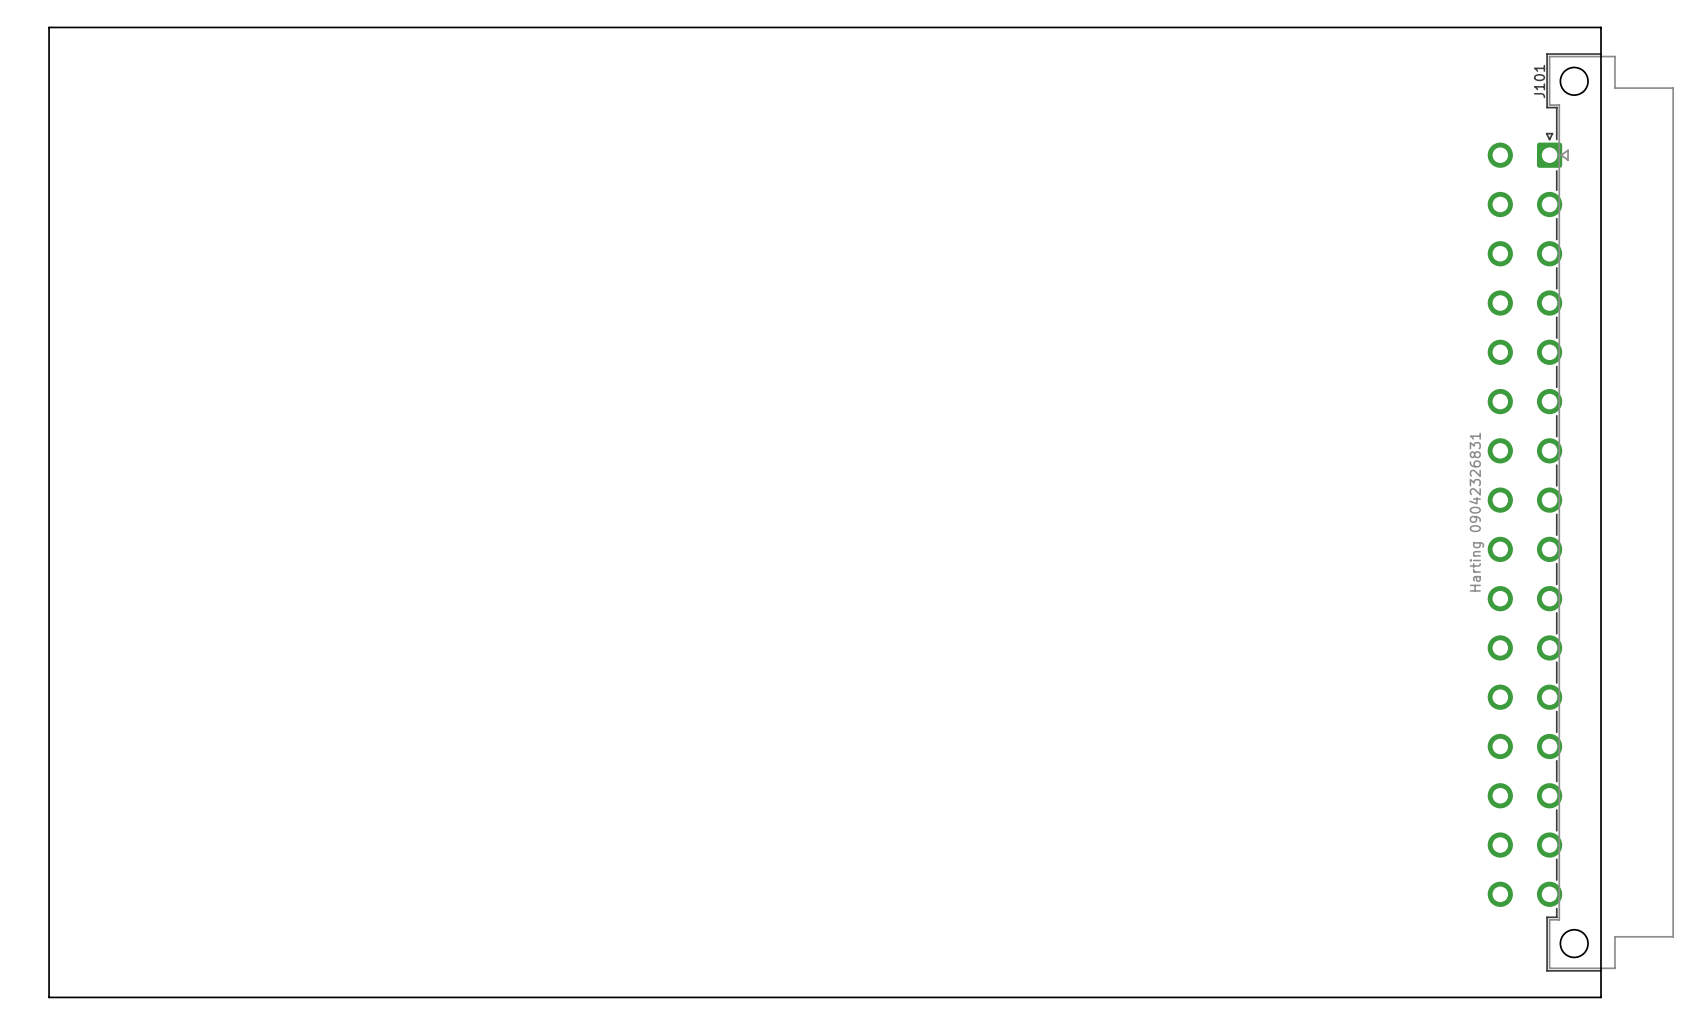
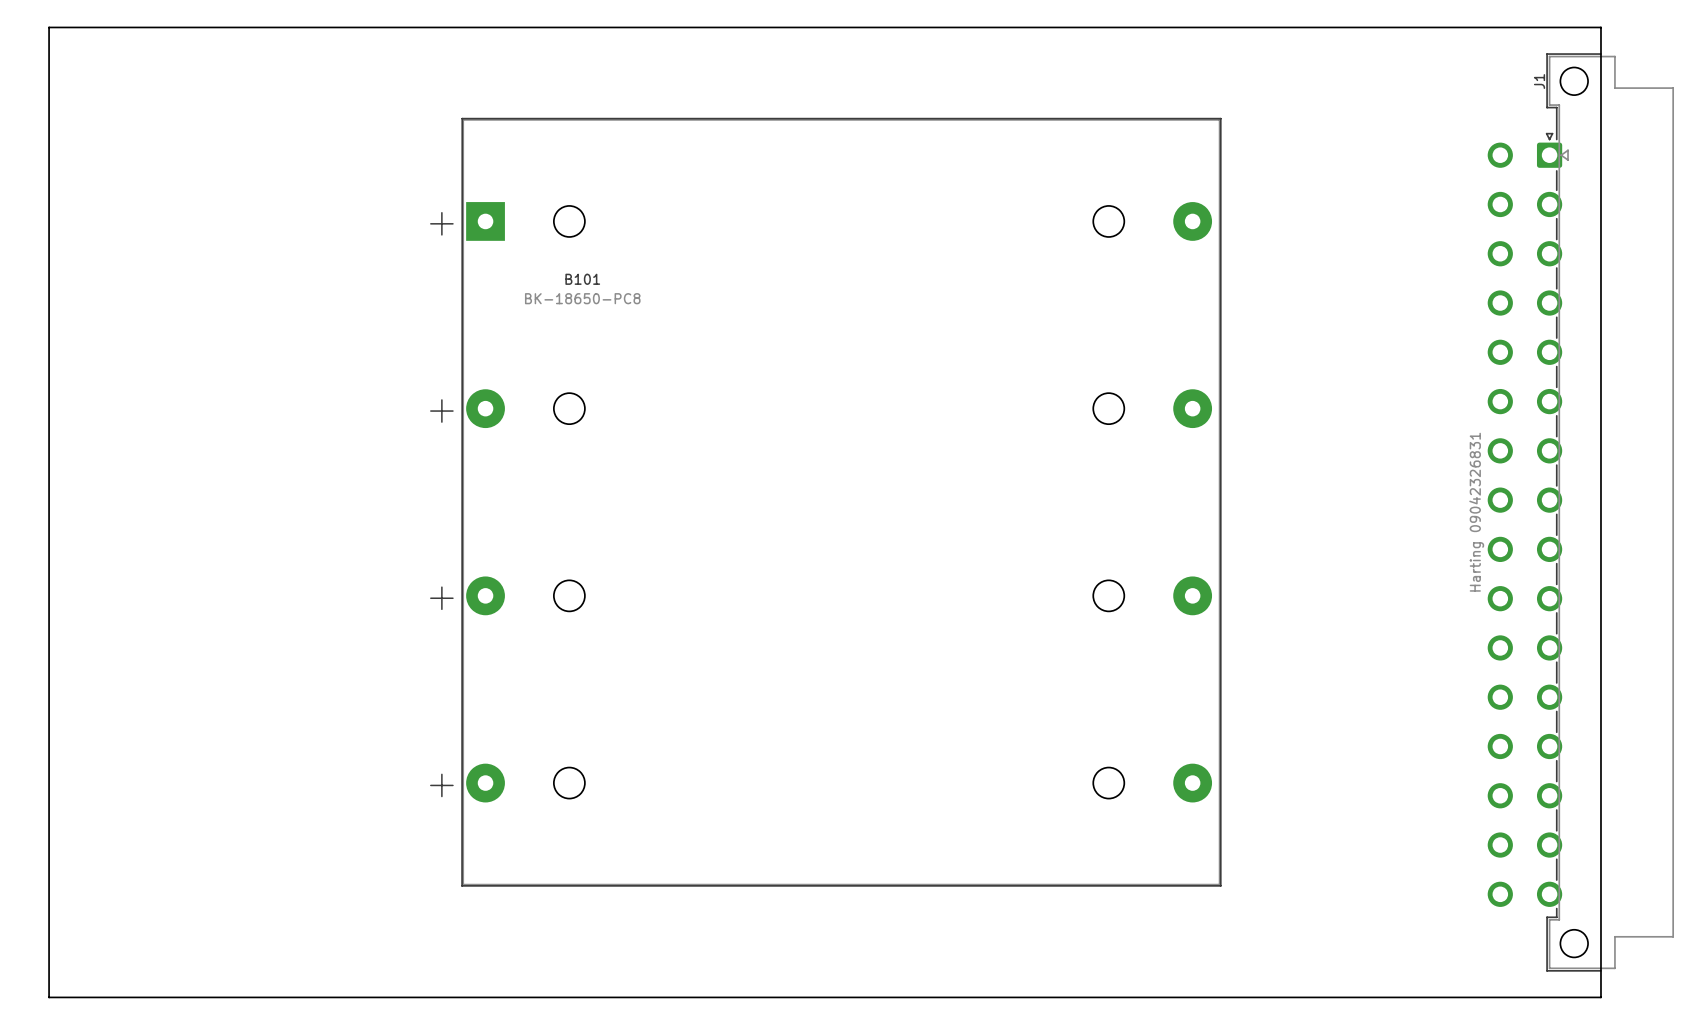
J101 name: J101 (1539, 81) -> J1 (1539, 81)
B101: none -> BK-18650-PC8 (841, 502)

